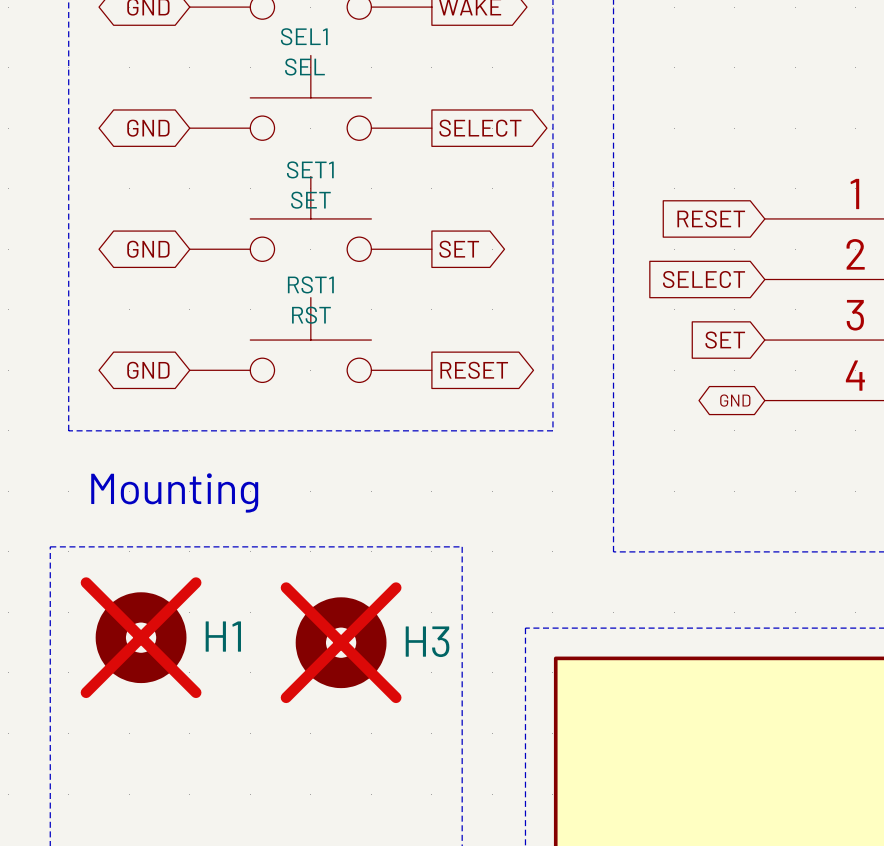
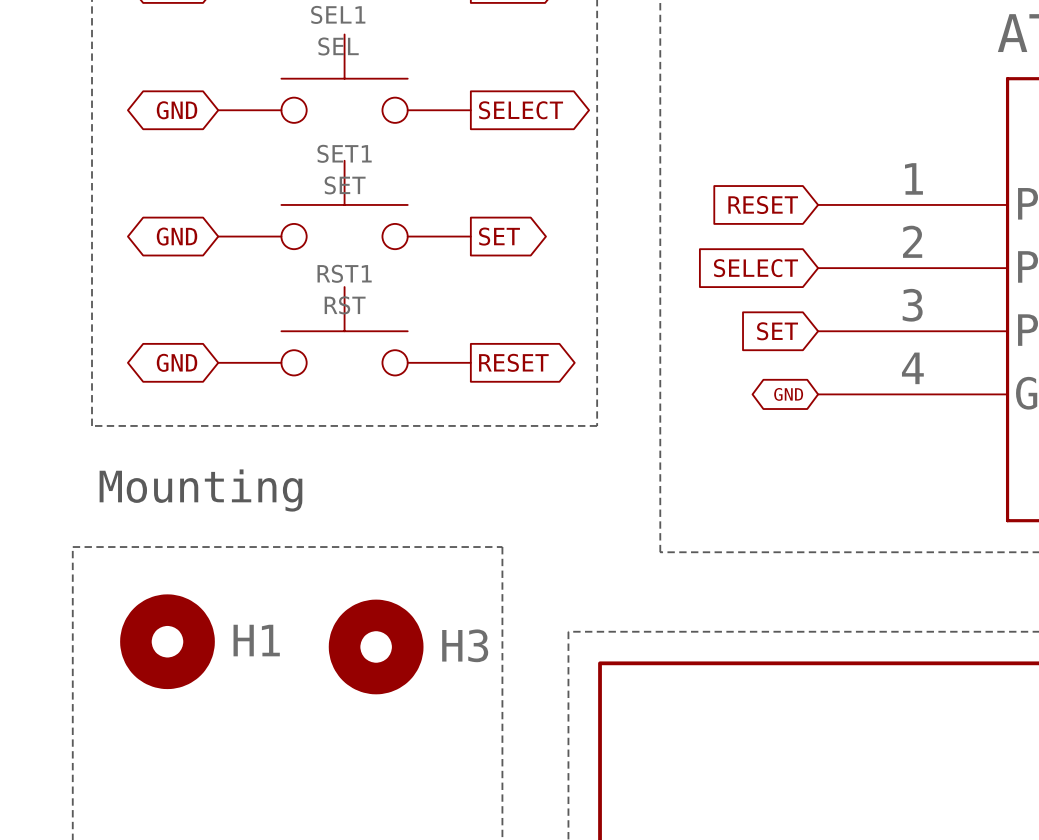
H1 do-not-place cross: (141, 637) -> none
H3 do-not-place cross: (341, 642) -> none

